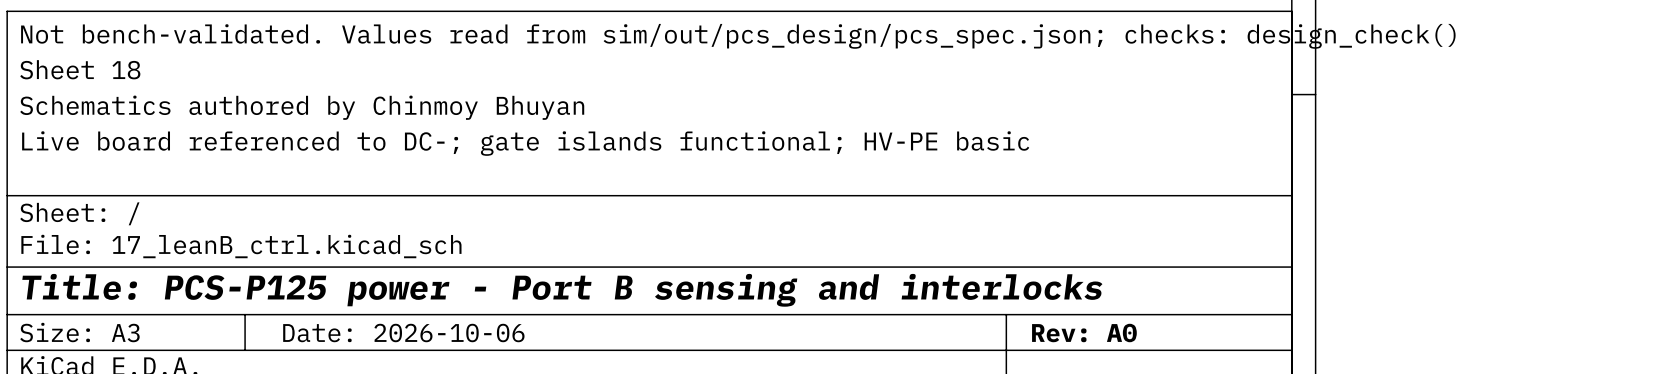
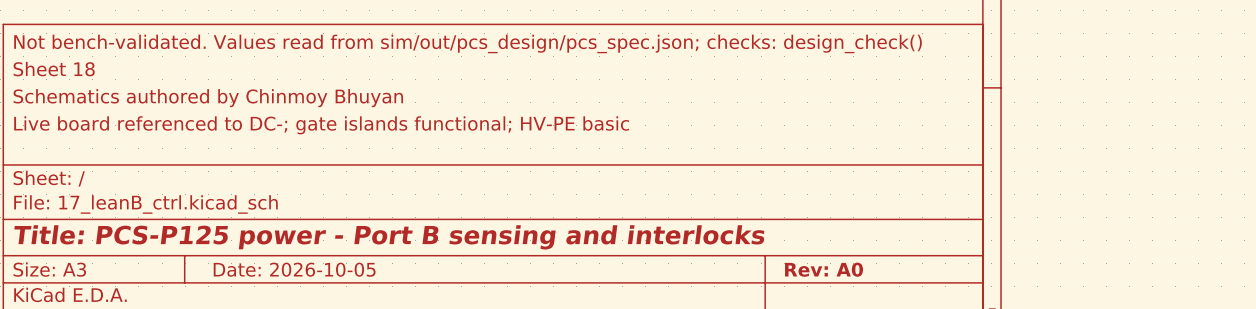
title block: Date: 2026-10-06 (403, 333) -> Date: 2026-10-05 (294, 269)

